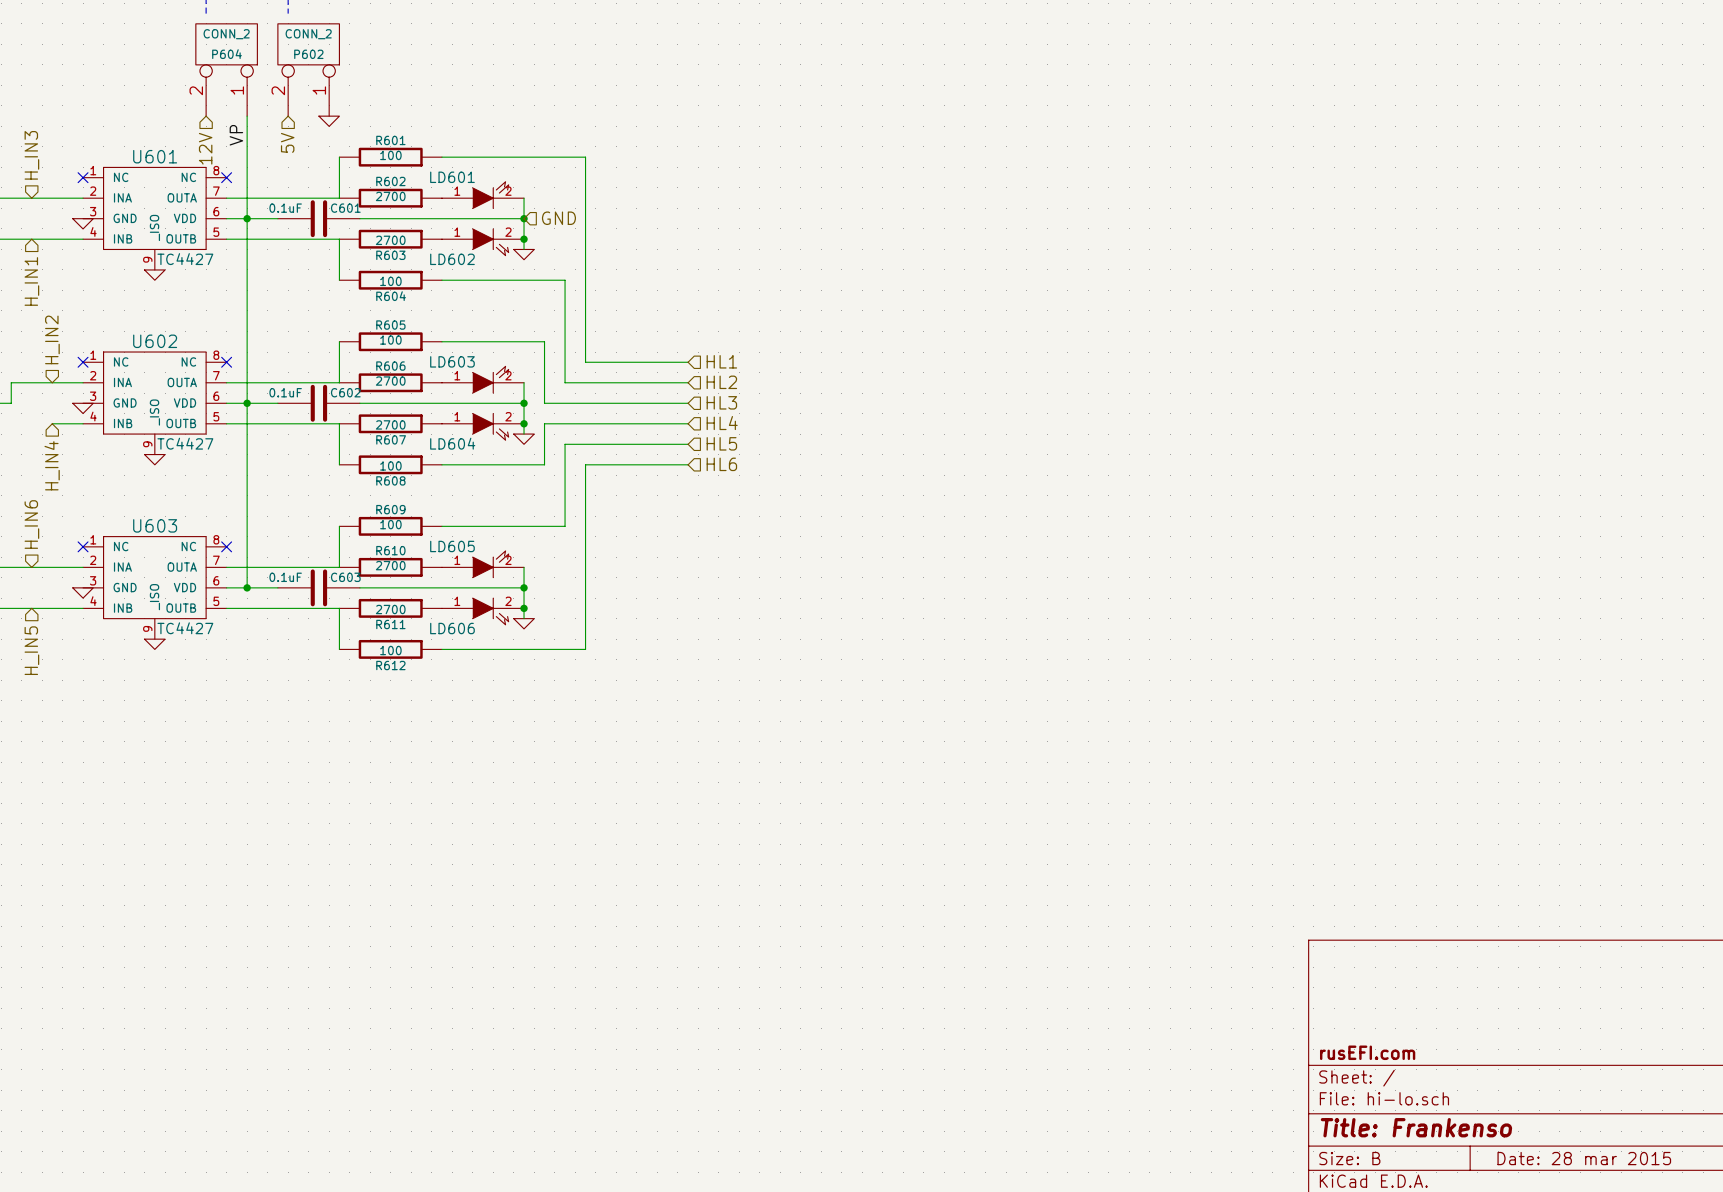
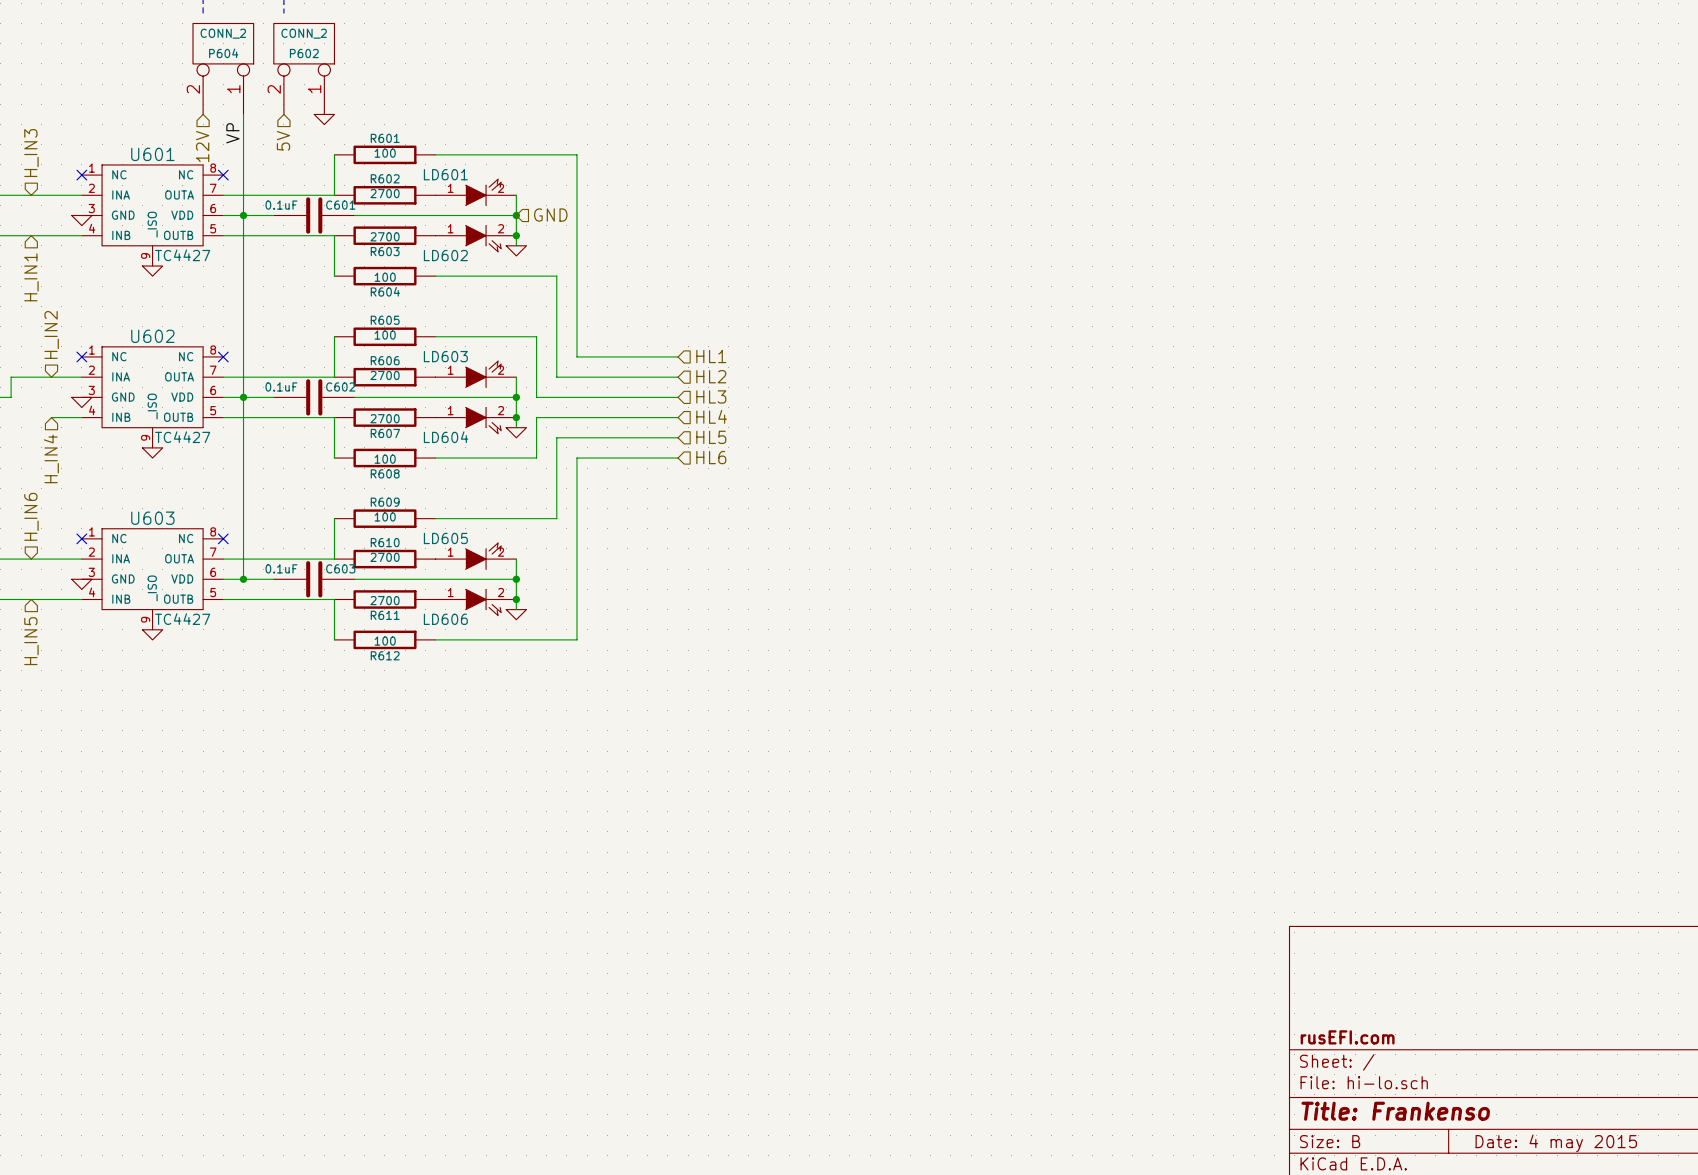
title block: Date: 28 mar 2015 (1584, 1158) -> Date: 4 may 2015 (1556, 1143)

